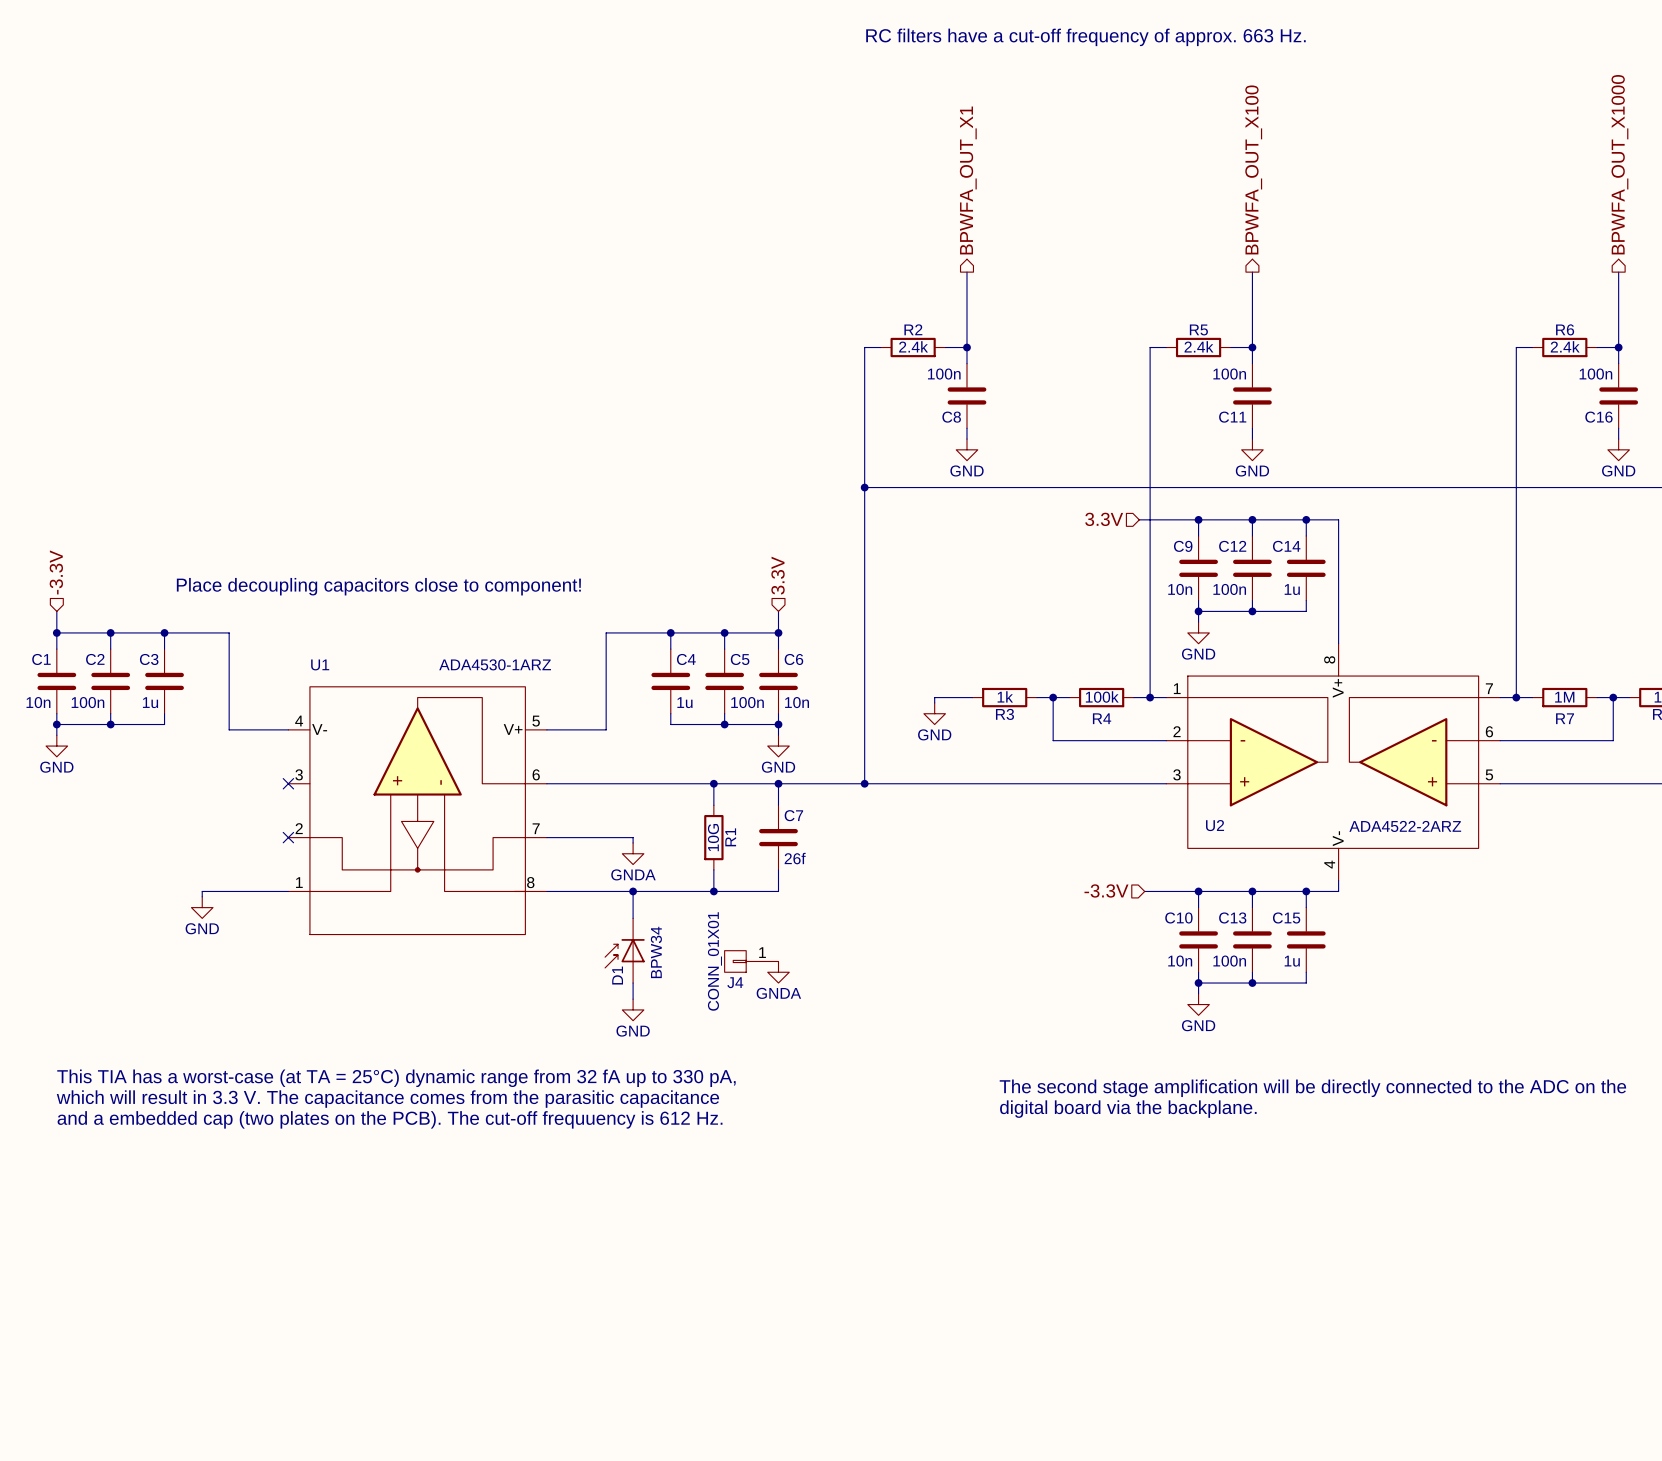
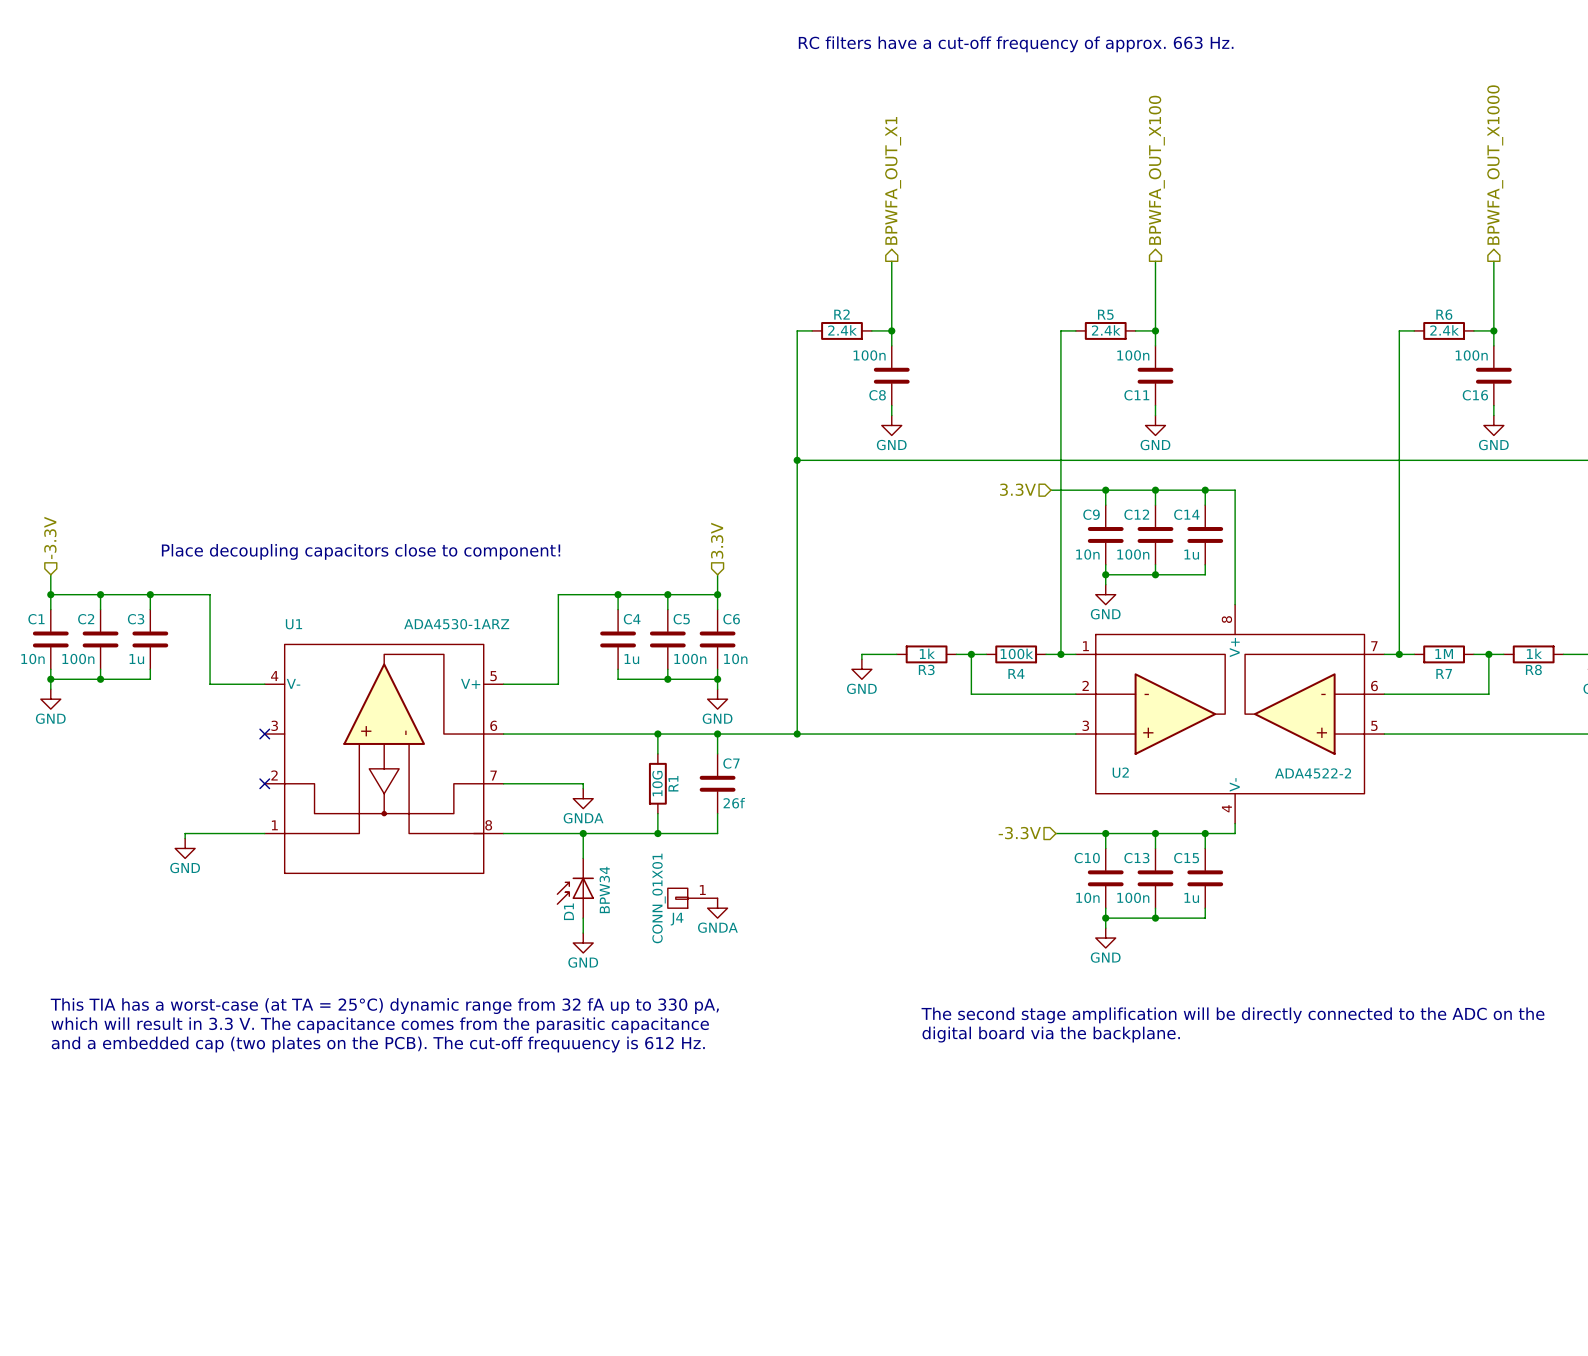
U2 value: ADA4522-2ARZ (1405, 826) -> ADA4522-2 (1313, 773)

